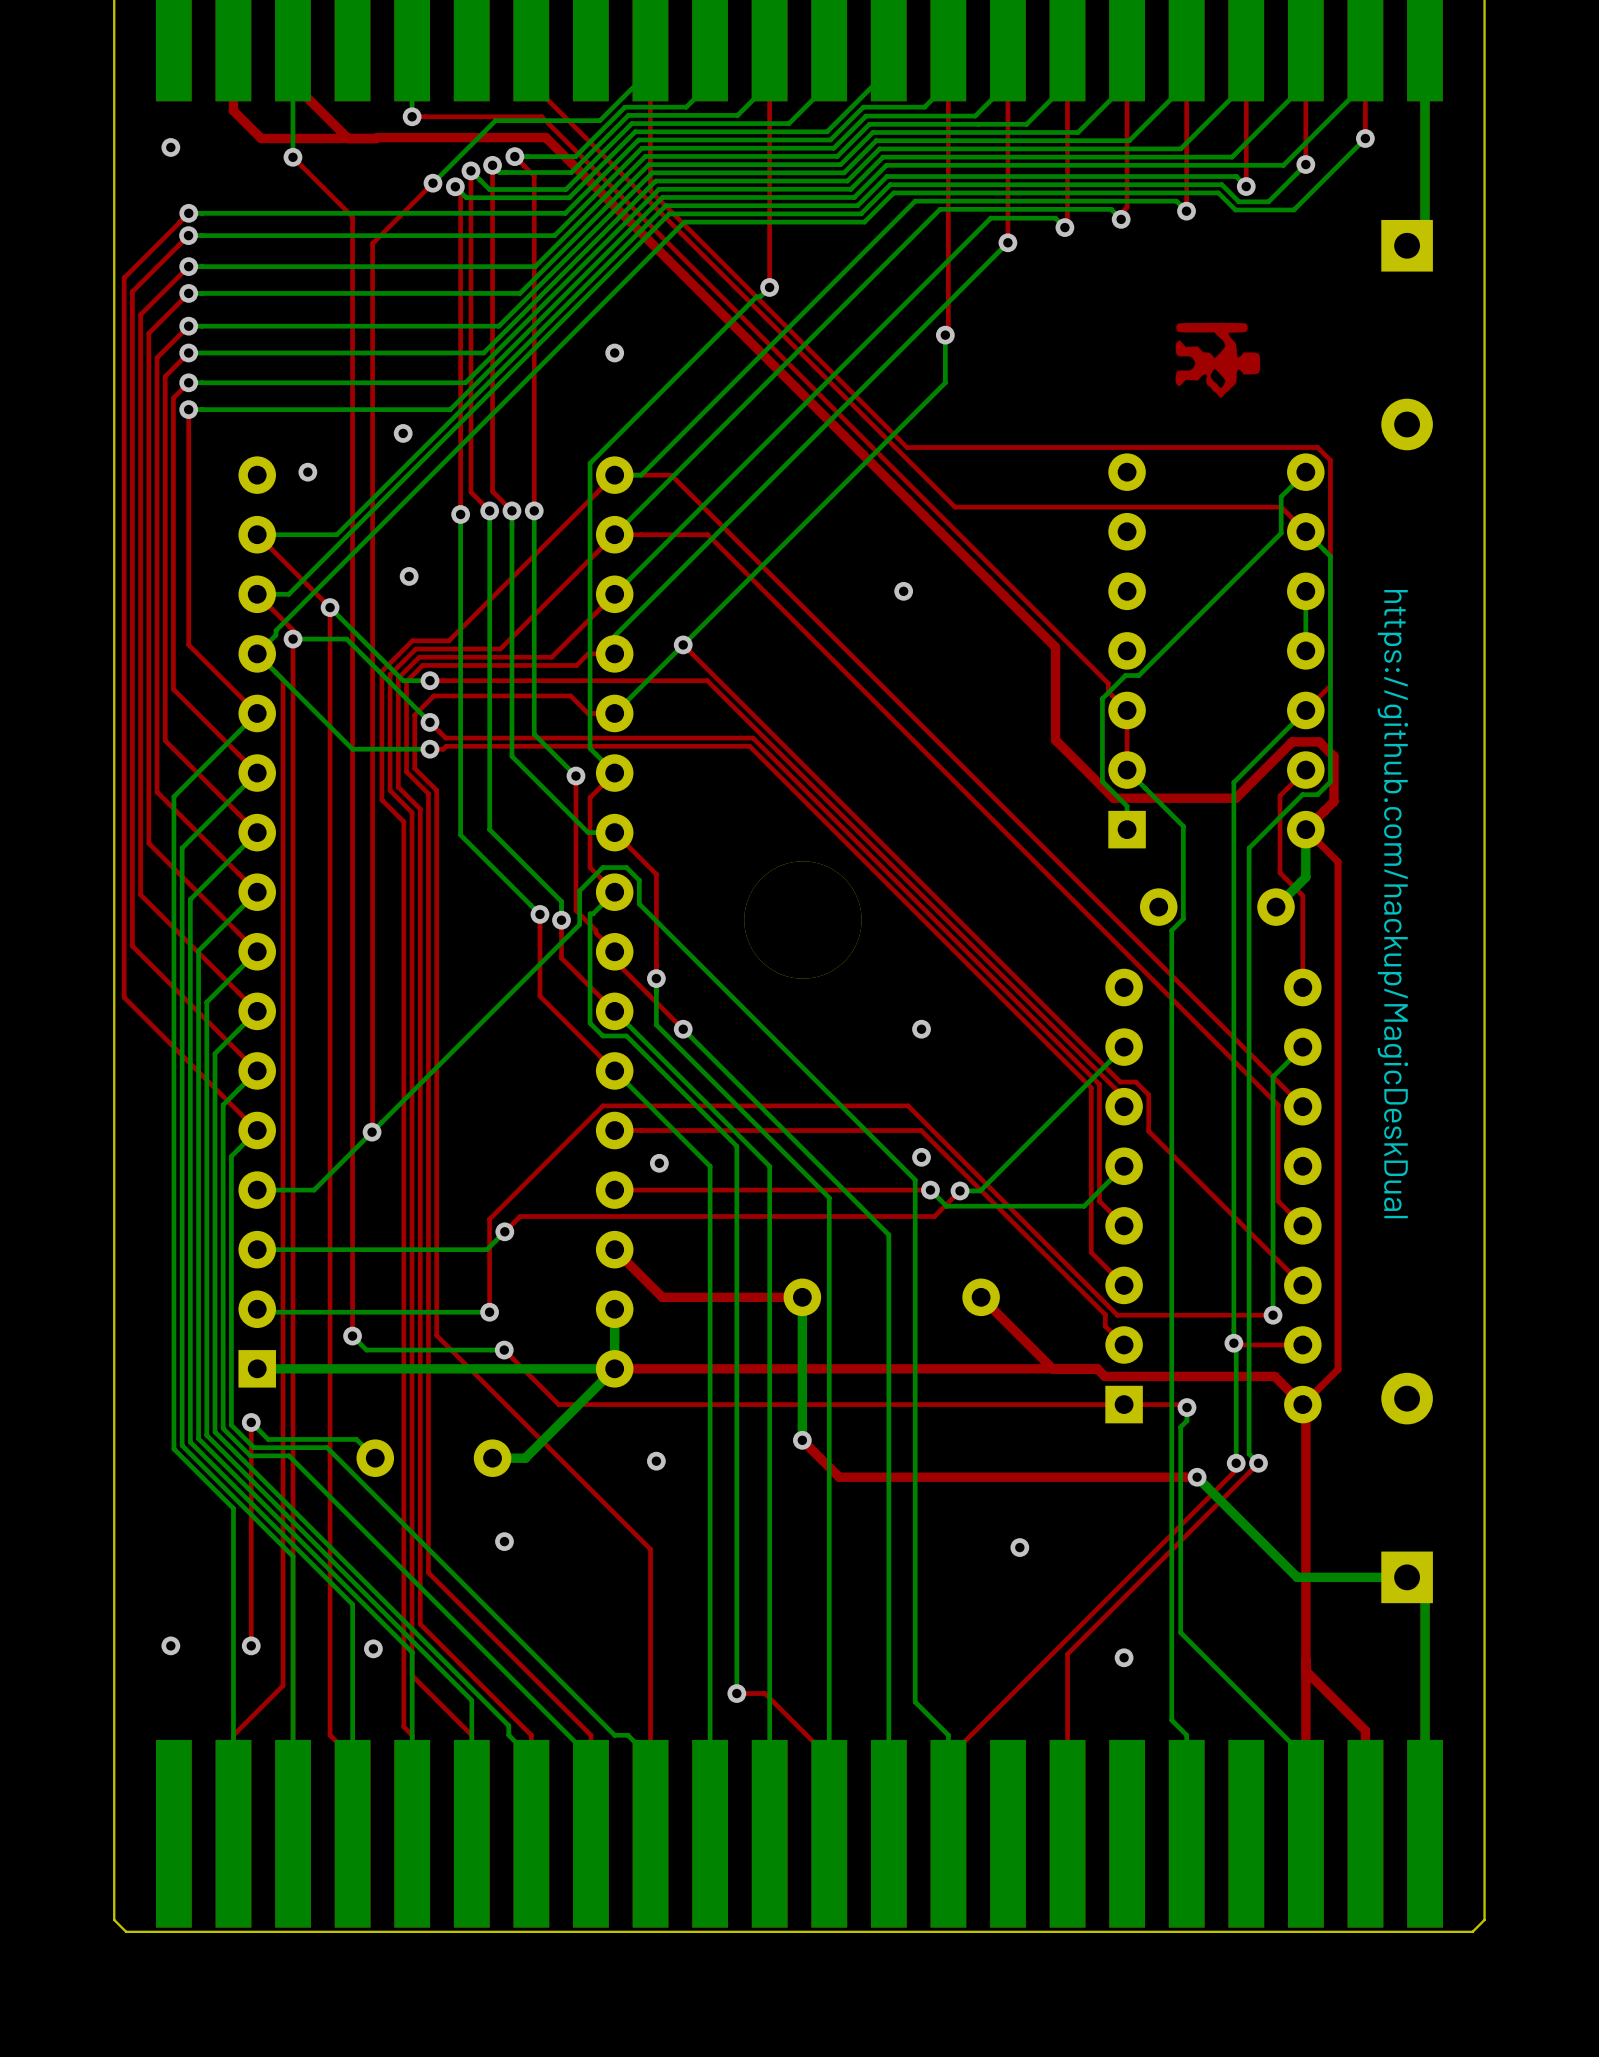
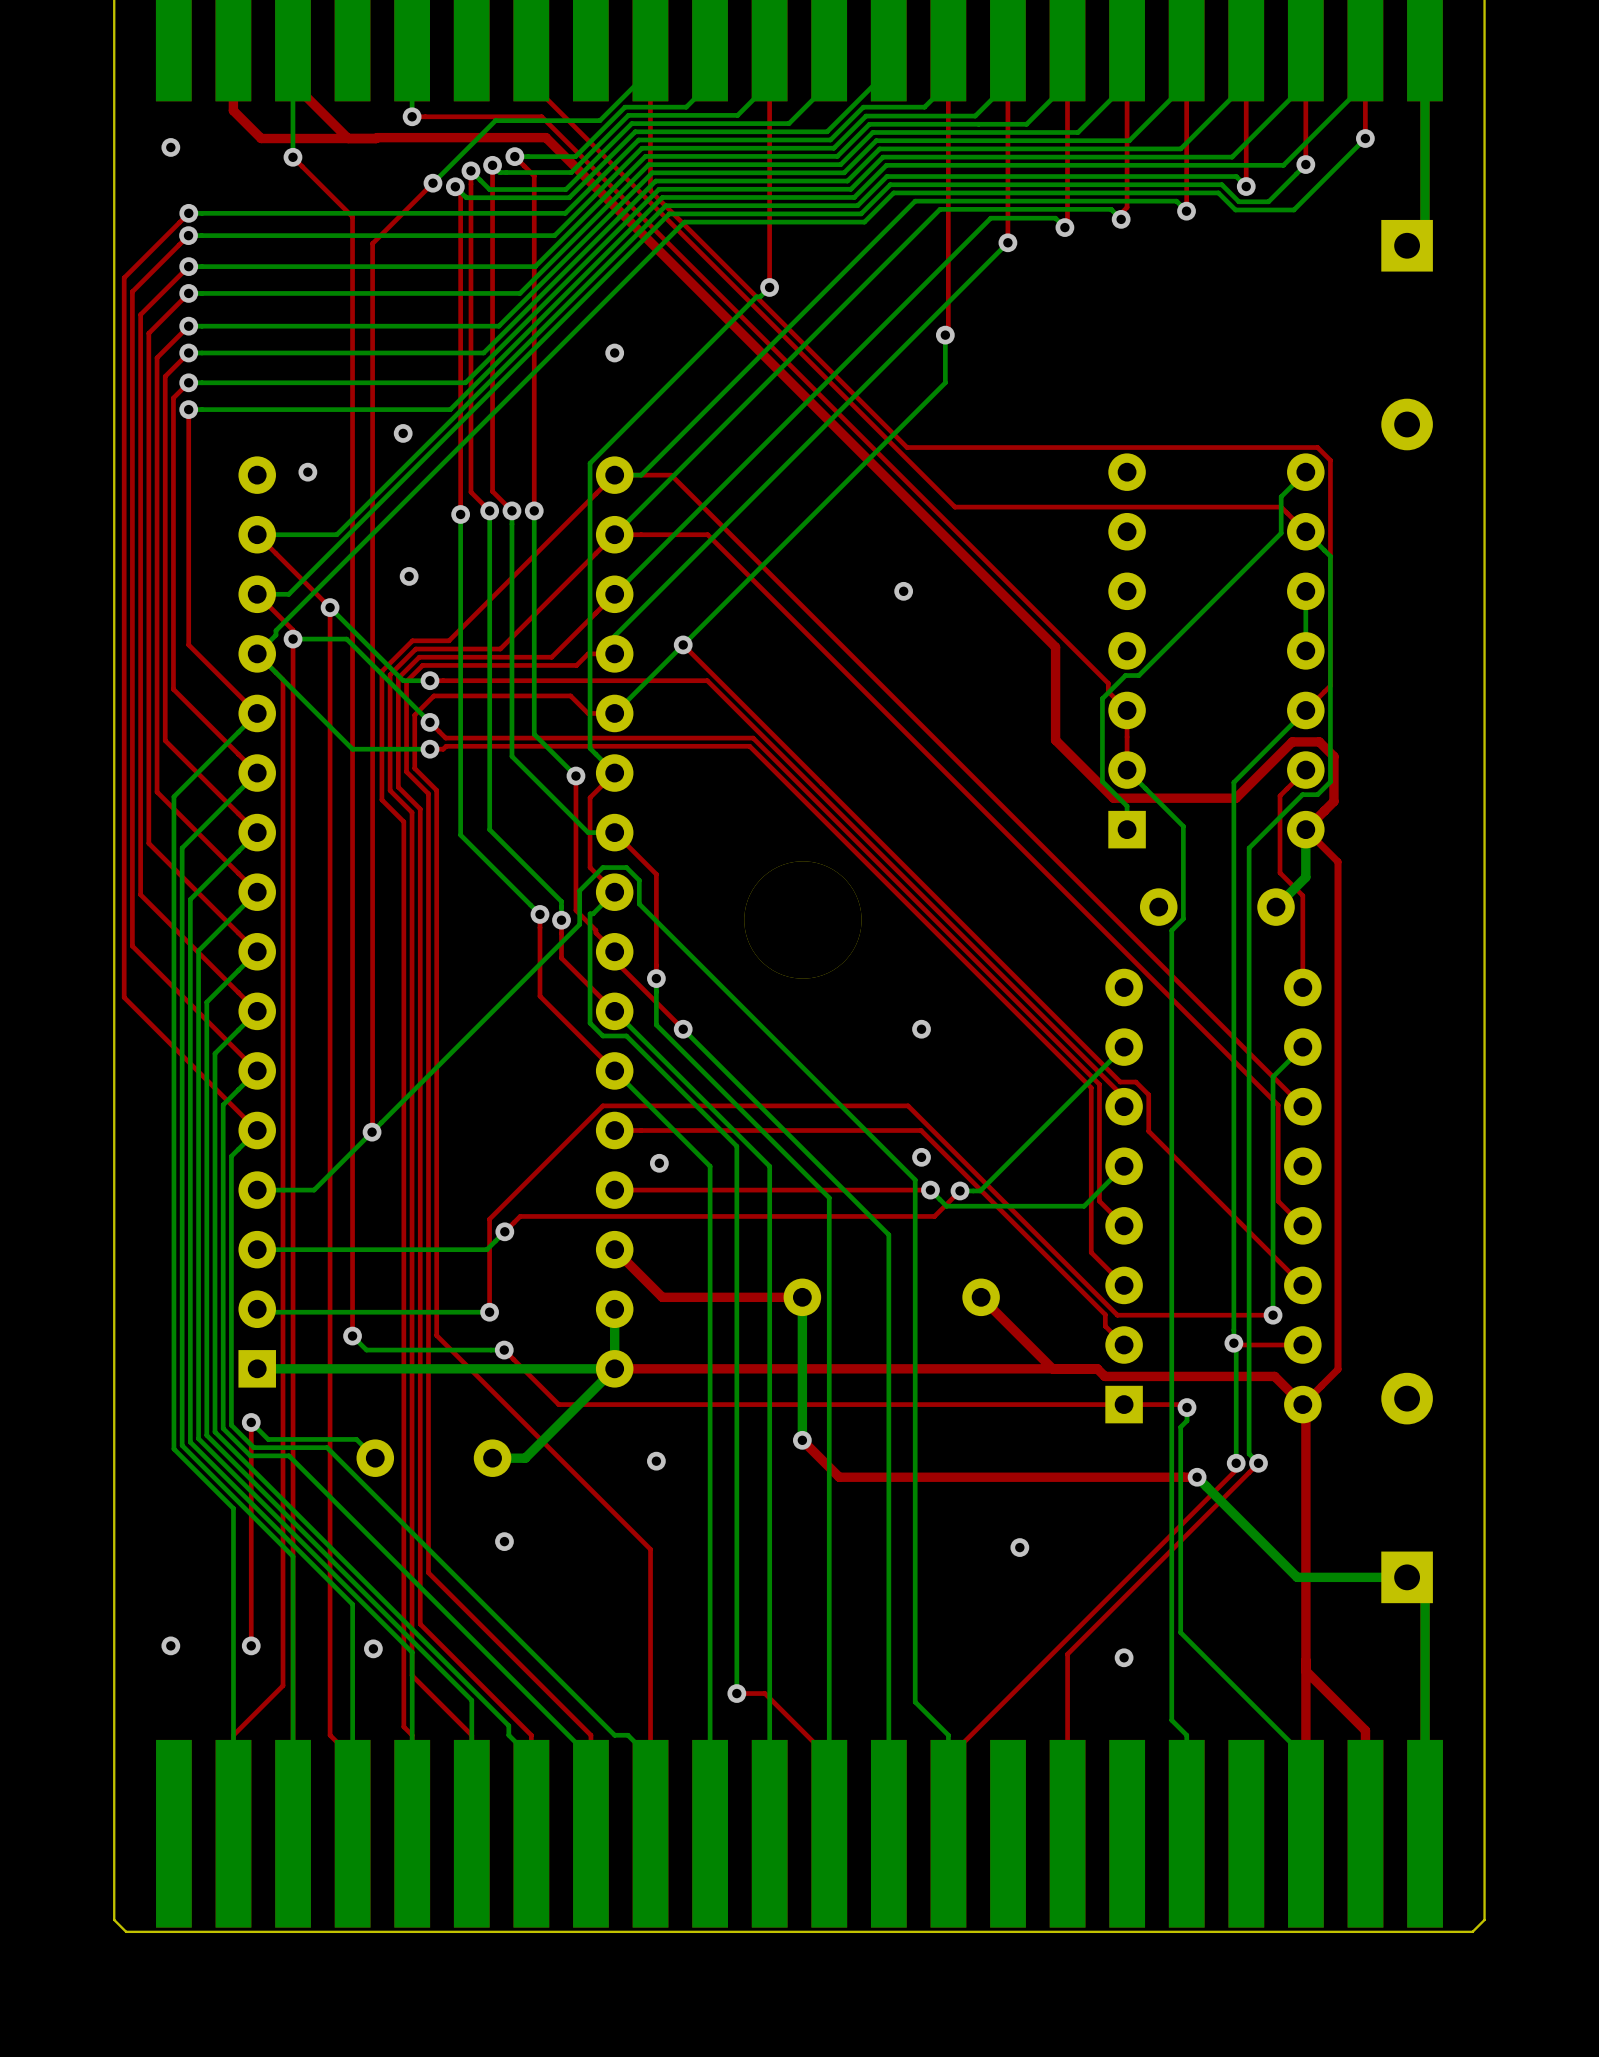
drawing: [1175, 322, 1261, 398] -> none
text: https://github.com/hackup/MagicDeskDual (1392, 904) -> none

